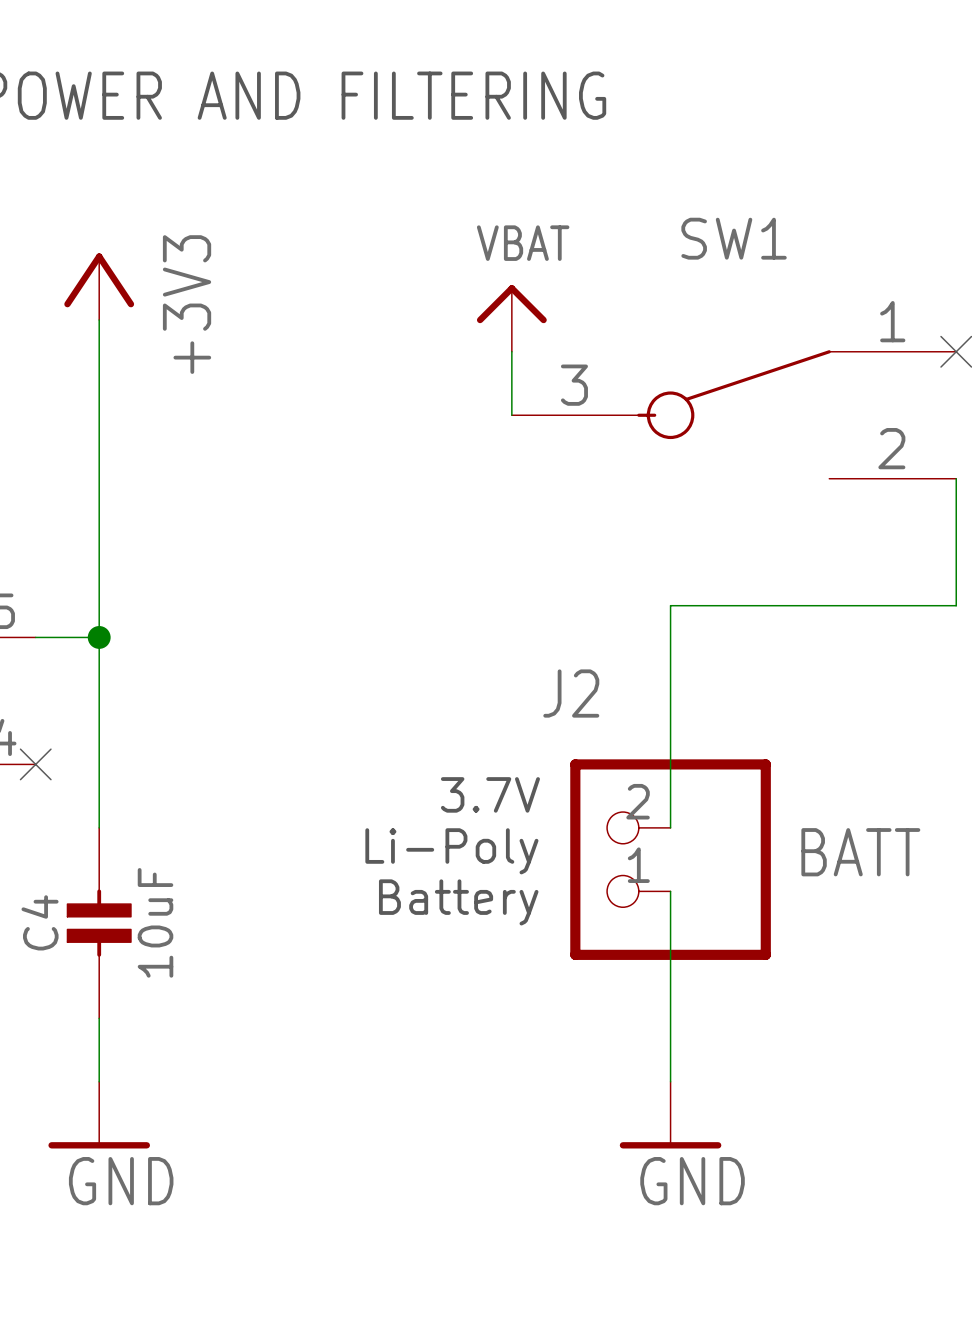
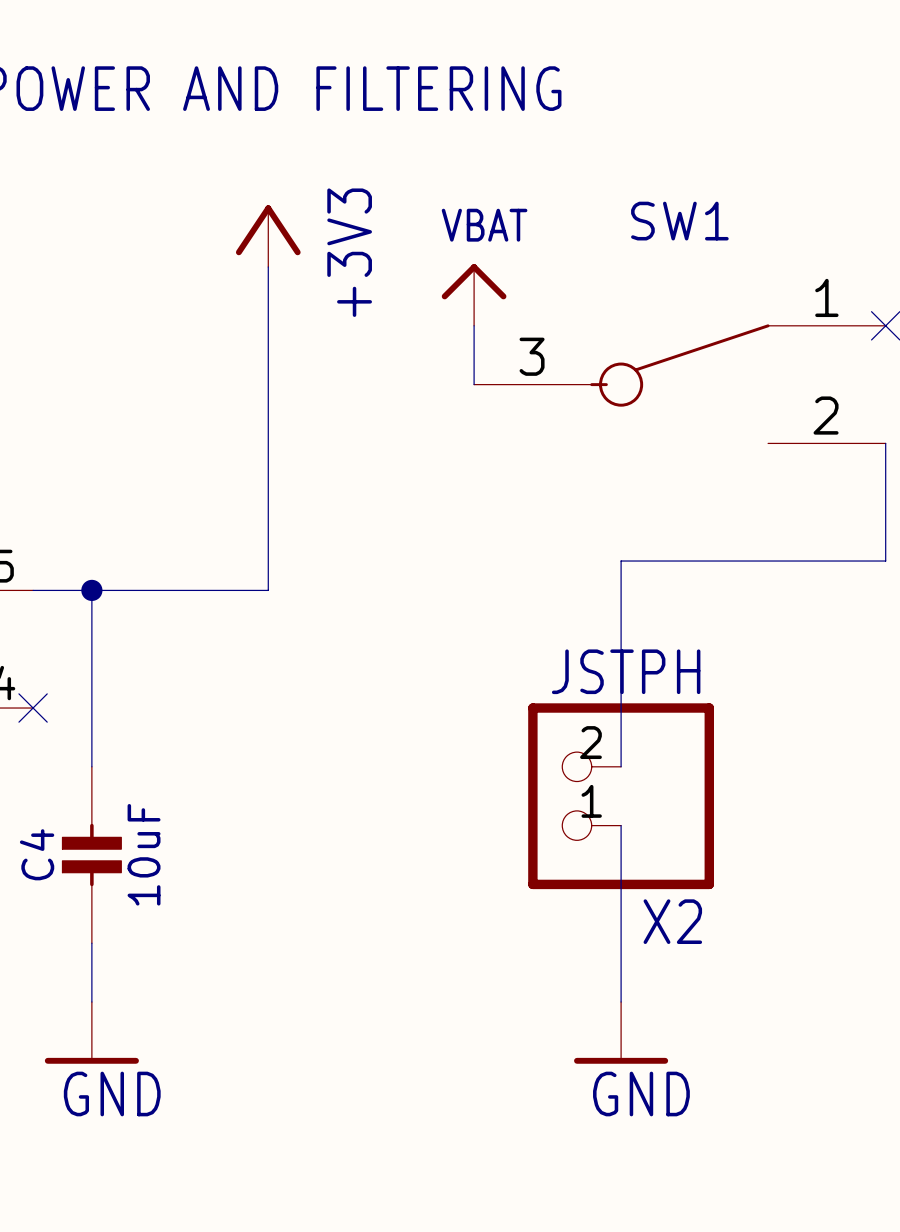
power symbol position: +3V3 (99, 286) -> +3V3 (268, 236)
wire: (99, 320) (99, 637) -> (268, 267) (268, 590) (91, 590)
J2 name: J2 (571, 693) -> X2 (672, 921)
text: 3.7V (490, 794) -> none
text: Li-Poly (451, 851) -> none
J2 value: BATT (860, 852) -> JSTPH (626, 671)
text: Battery (458, 902) -> none

